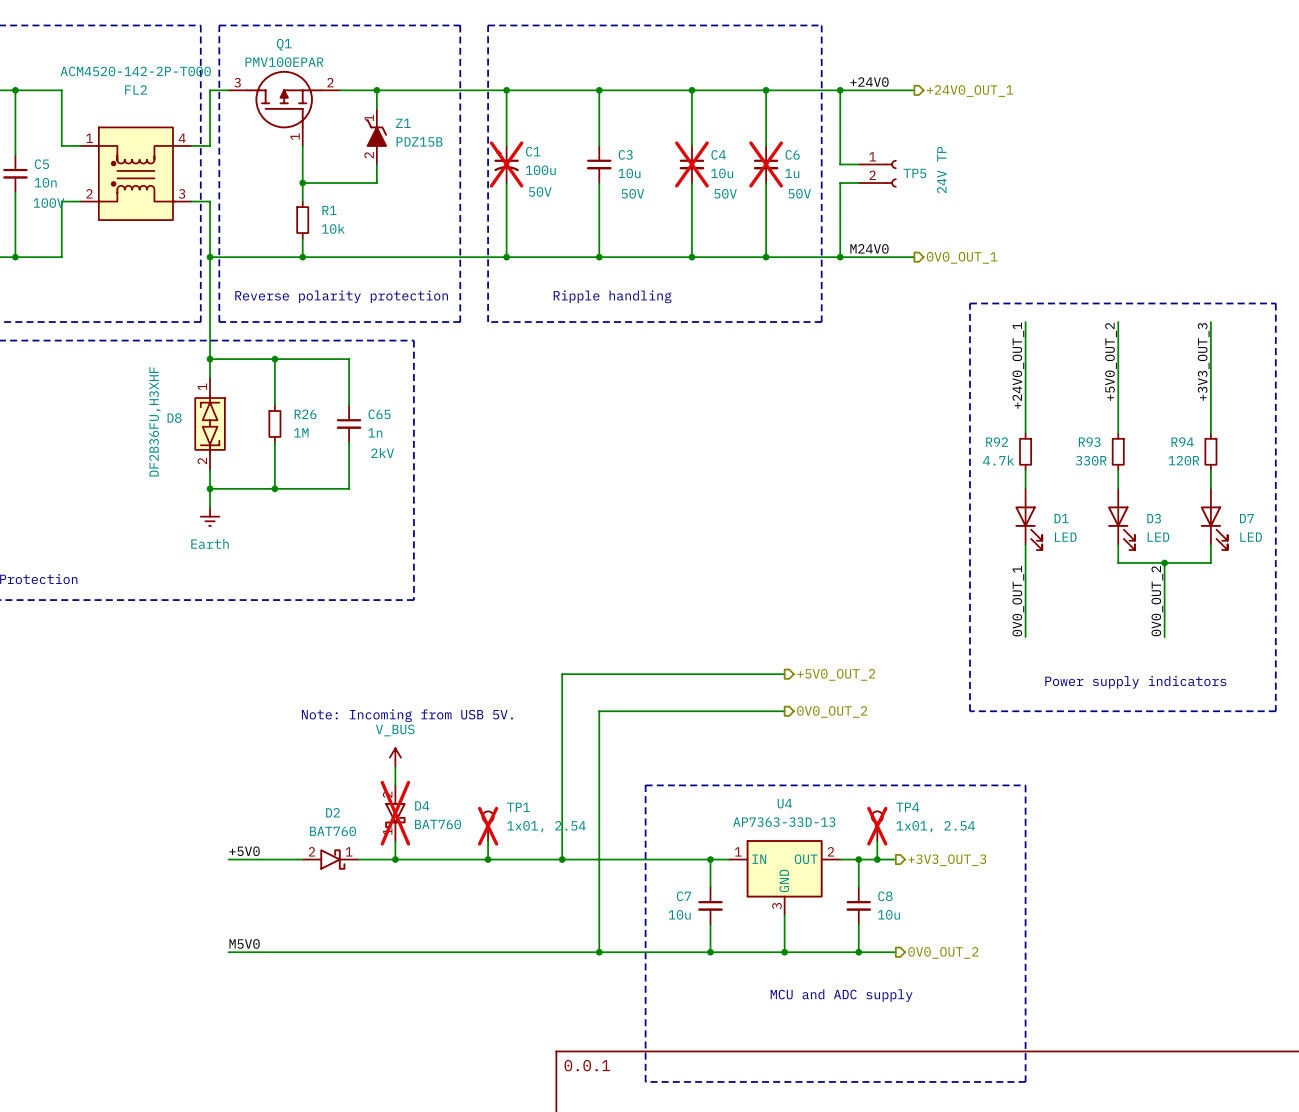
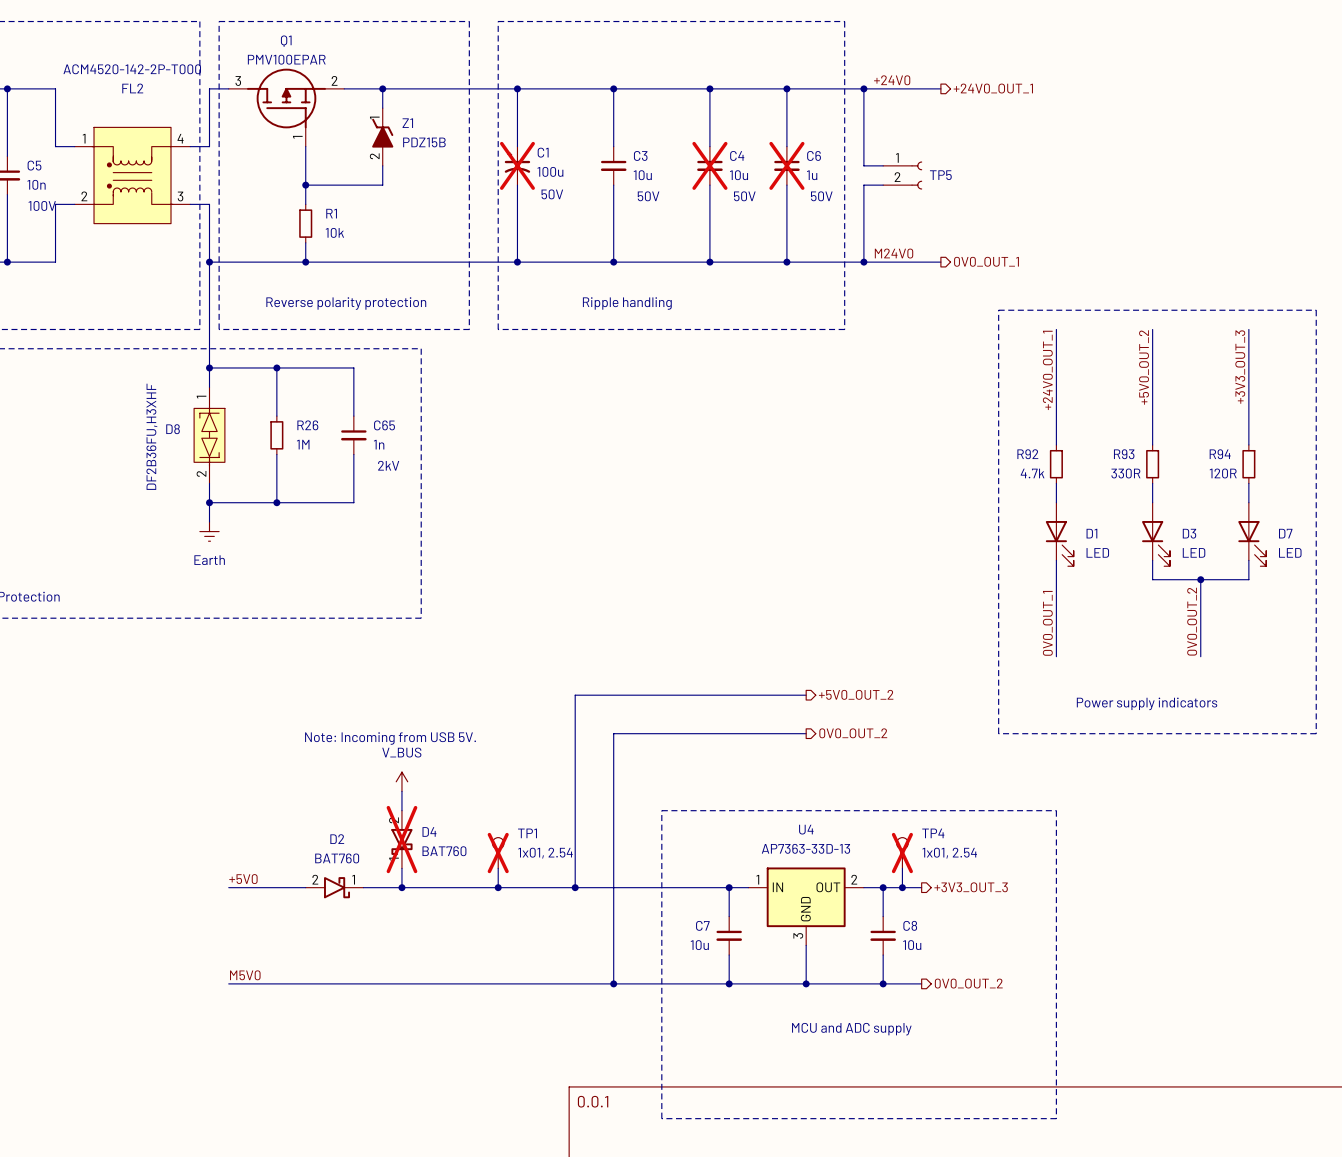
TP5 text: 24V TP (941, 169) -> none

